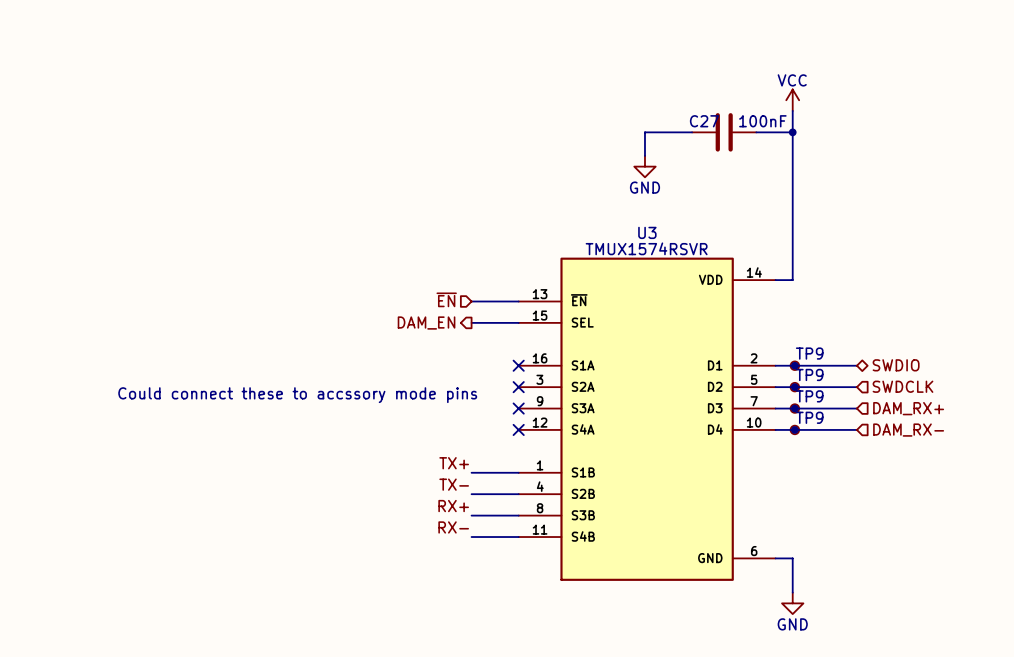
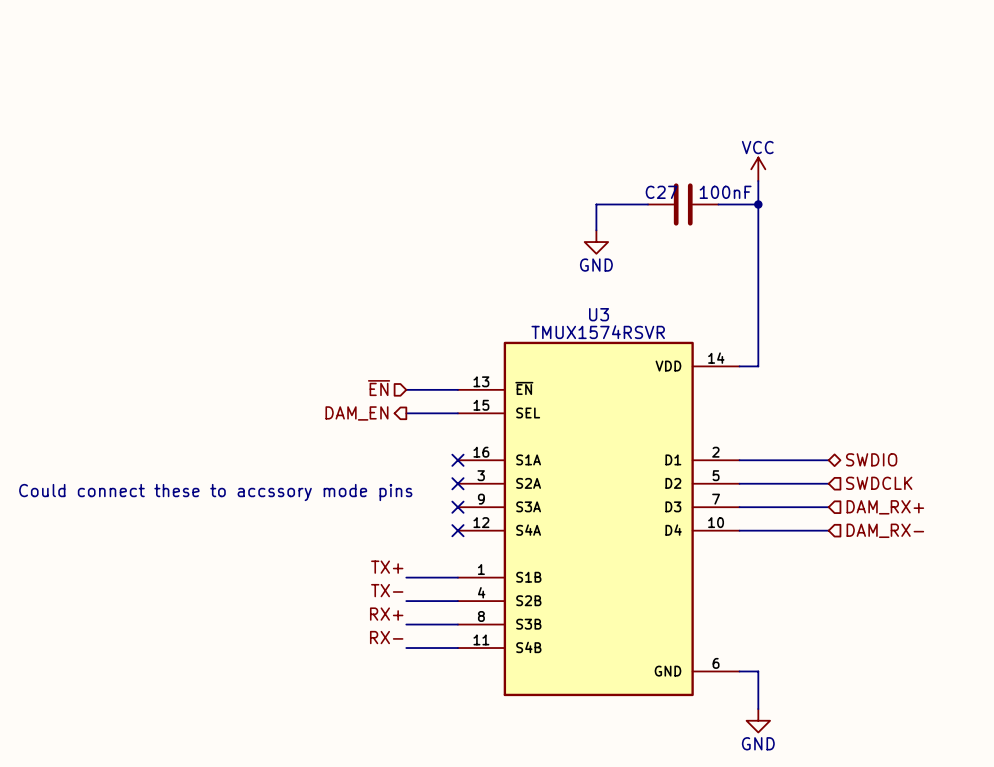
junction: (794, 365) -> none
TP9: (794, 365) -> none
junction: (794, 387) -> none
TP9: (794, 387) -> none
junction: (794, 408) -> none
TP9: (794, 408) -> none
junction: (794, 429) -> none
TP9: (794, 429) -> none

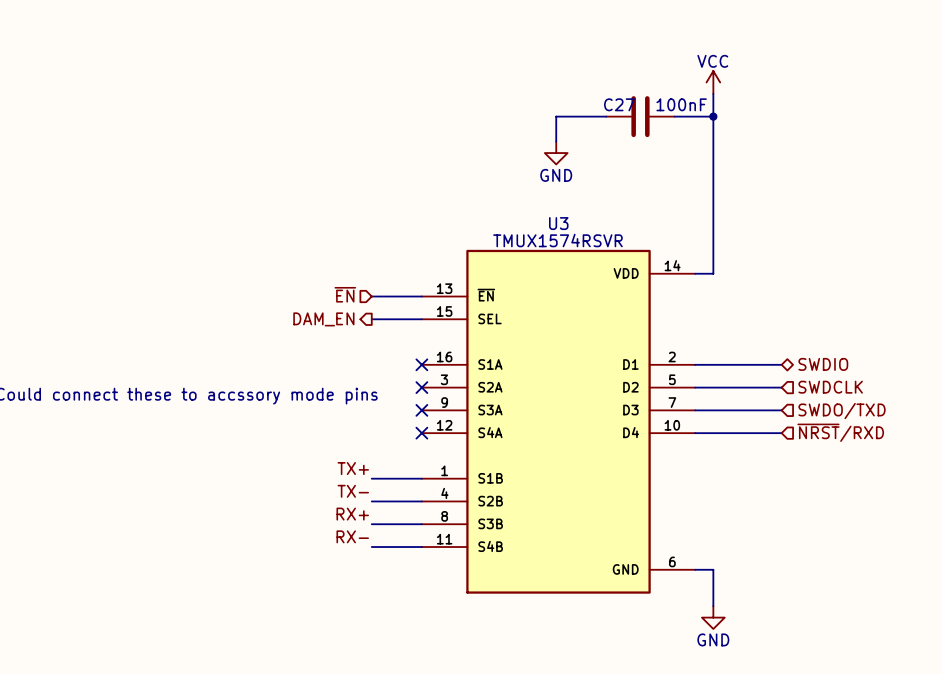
hierarchical label: DAM_RX+ (885, 507) -> SWDO/TXD (842, 411)
hierarchical label: DAM_RX- (885, 530) -> ~{NRST}/RXD (840, 432)

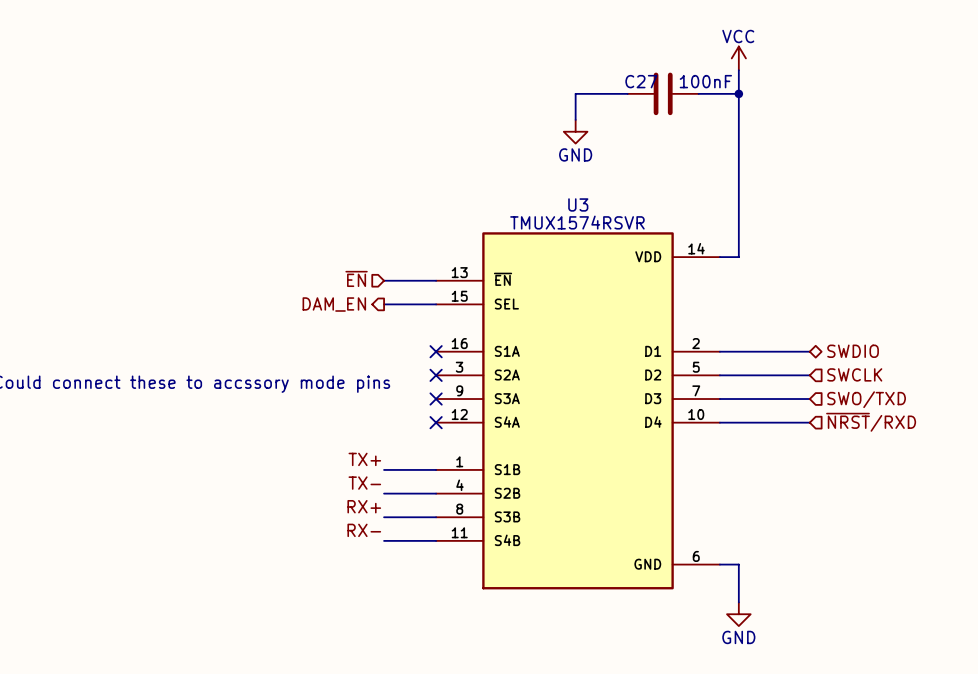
hierarchical label: SWDCLK (830, 387) -> SWCLK (854, 374)
hierarchical label: SWDO/TXD (842, 411) -> SWO/TXD (866, 399)

